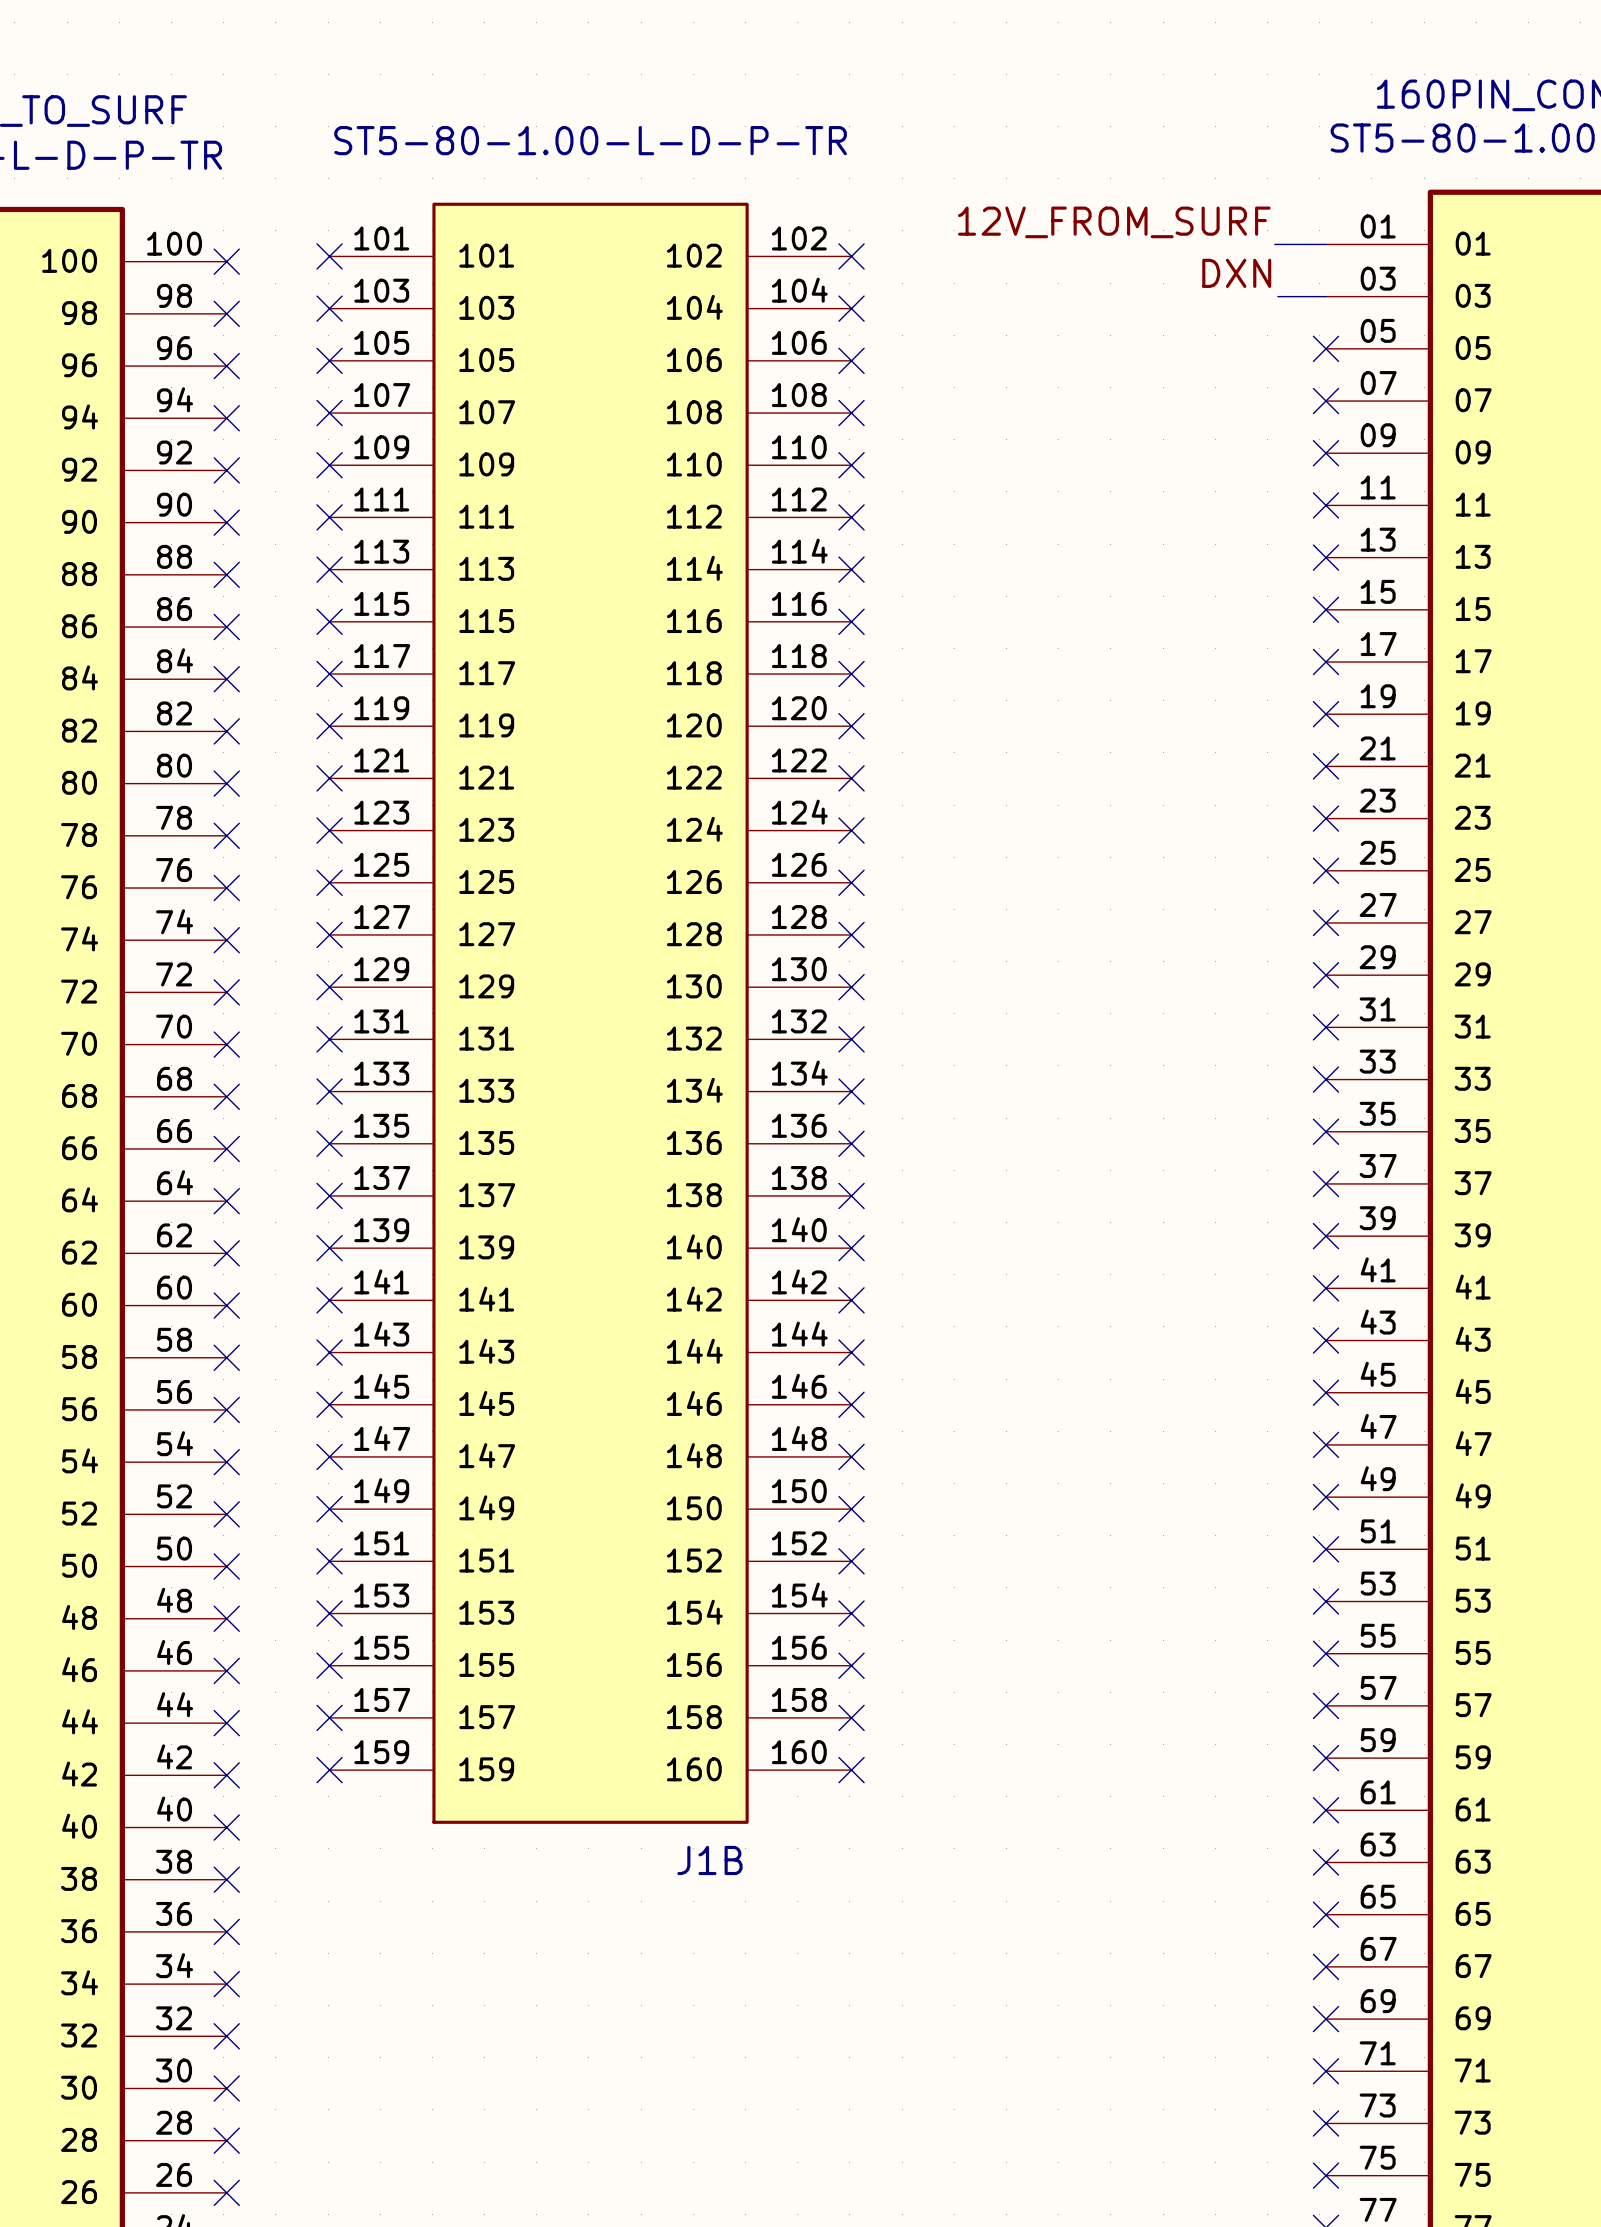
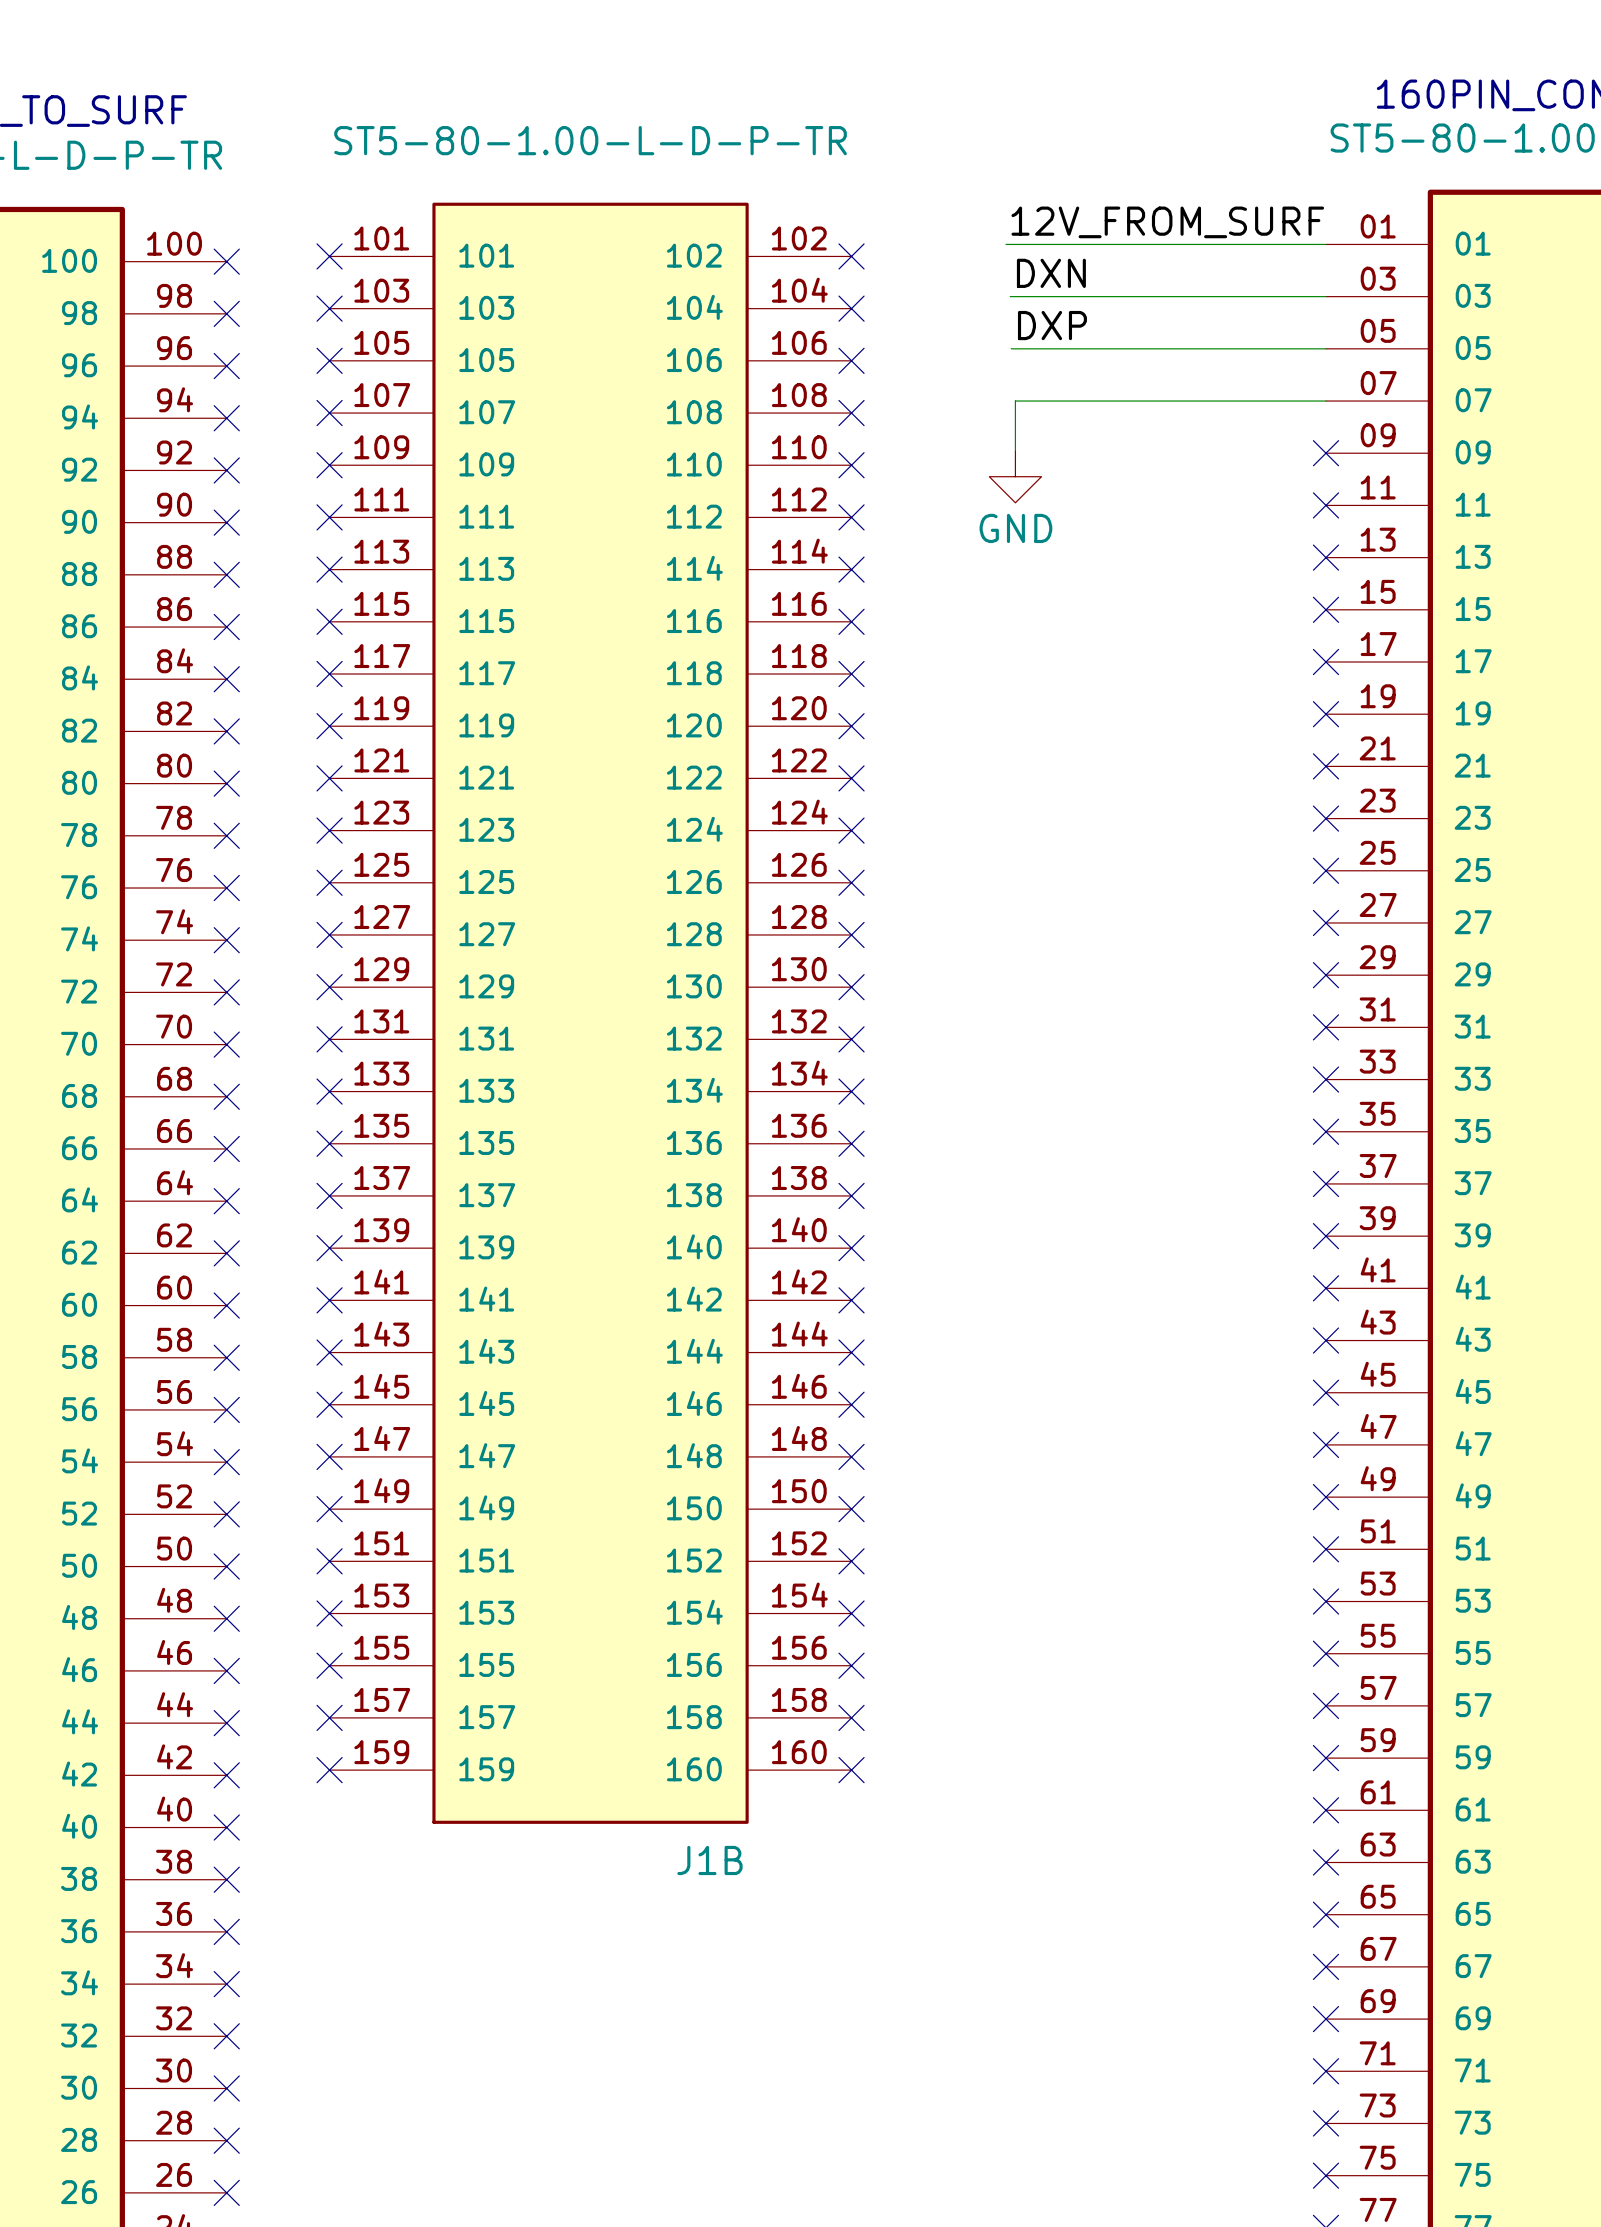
label position: 12V_FROM_SURF (1114, 222) -> 12V_FROM_SURF (1167, 222)
wire: none -> (1006, 244) (1274, 244)
label position: DXN (1236, 273) -> DXN (1051, 273)
wire: none -> (1010, 296) (1277, 296)
label: none -> DXP (1052, 325)
wire: none -> (1011, 348) (1325, 348)
no-connect mark: (1325, 348) -> none
wire: none -> (1325, 401) (1015, 401) (1015, 450)
no-connect mark: (1325, 401) -> none
power symbol: none -> GND (1015, 476)

